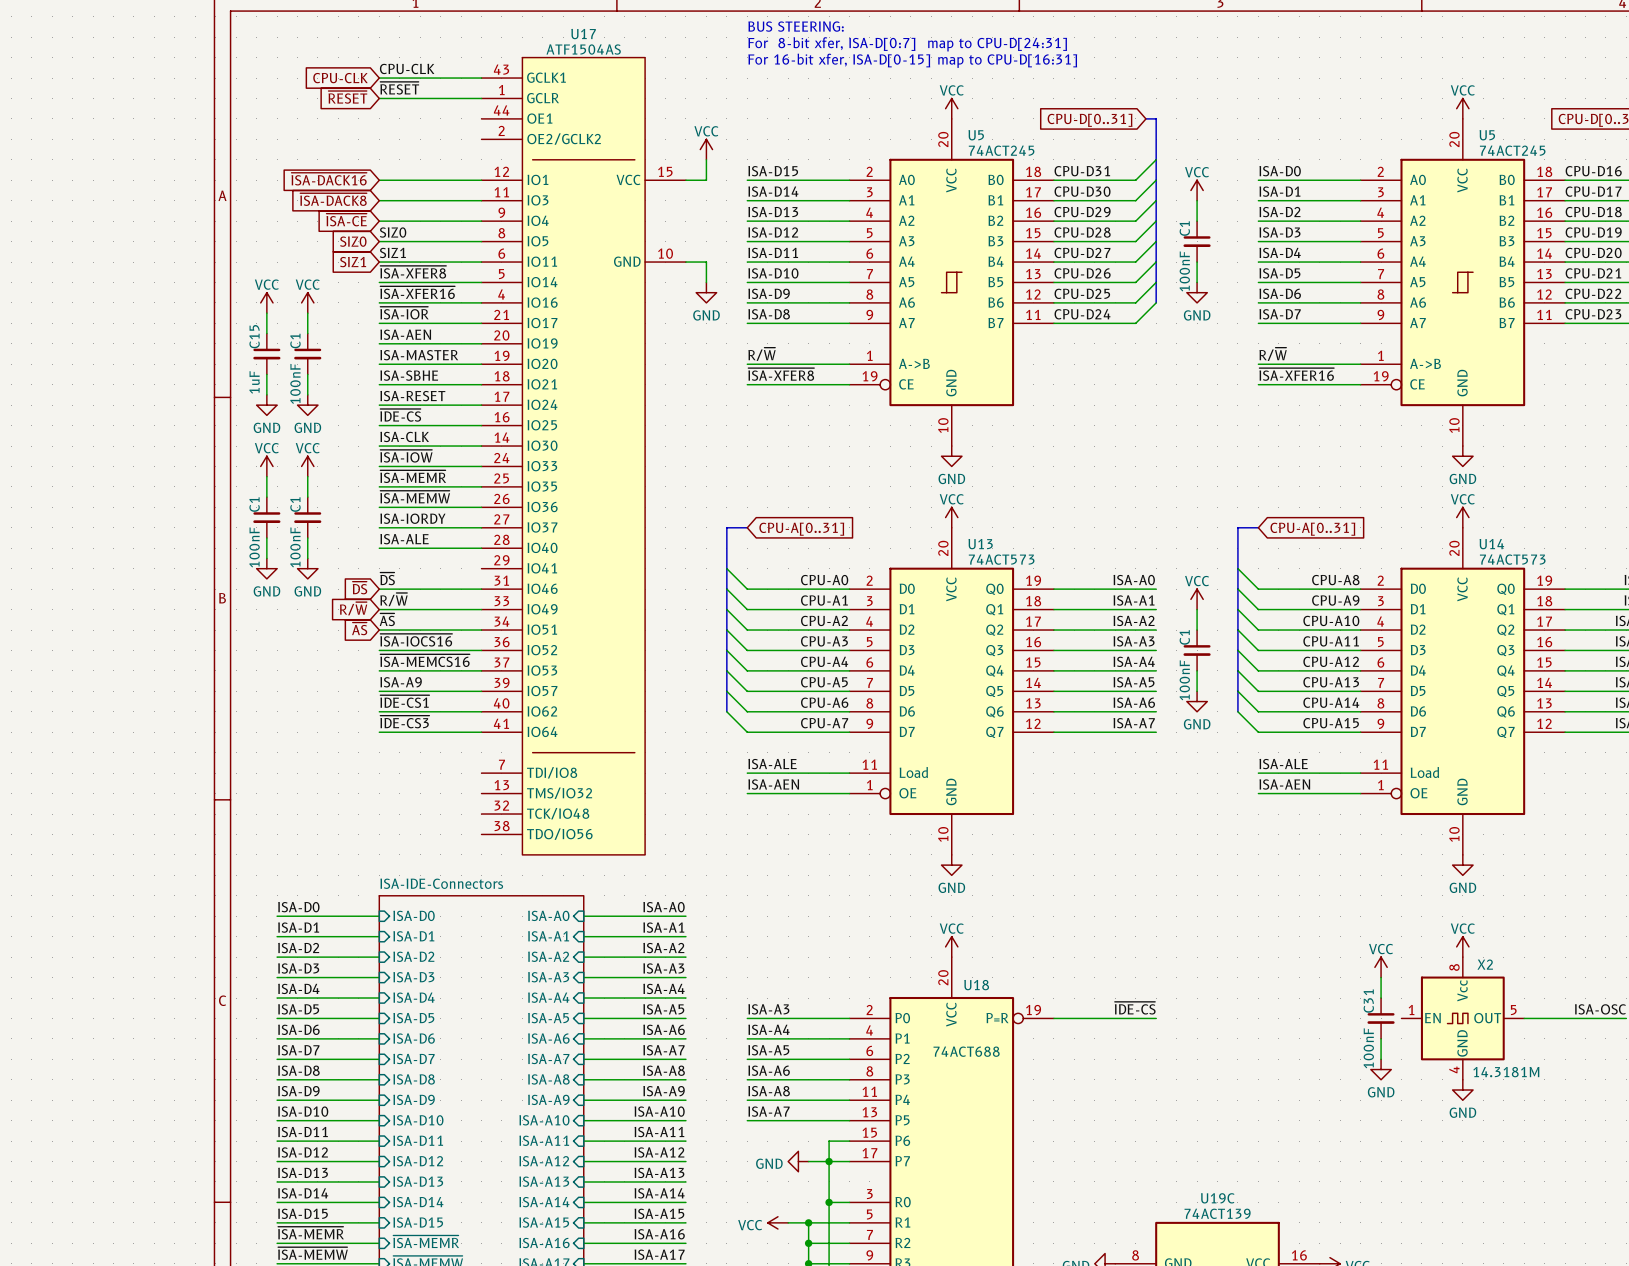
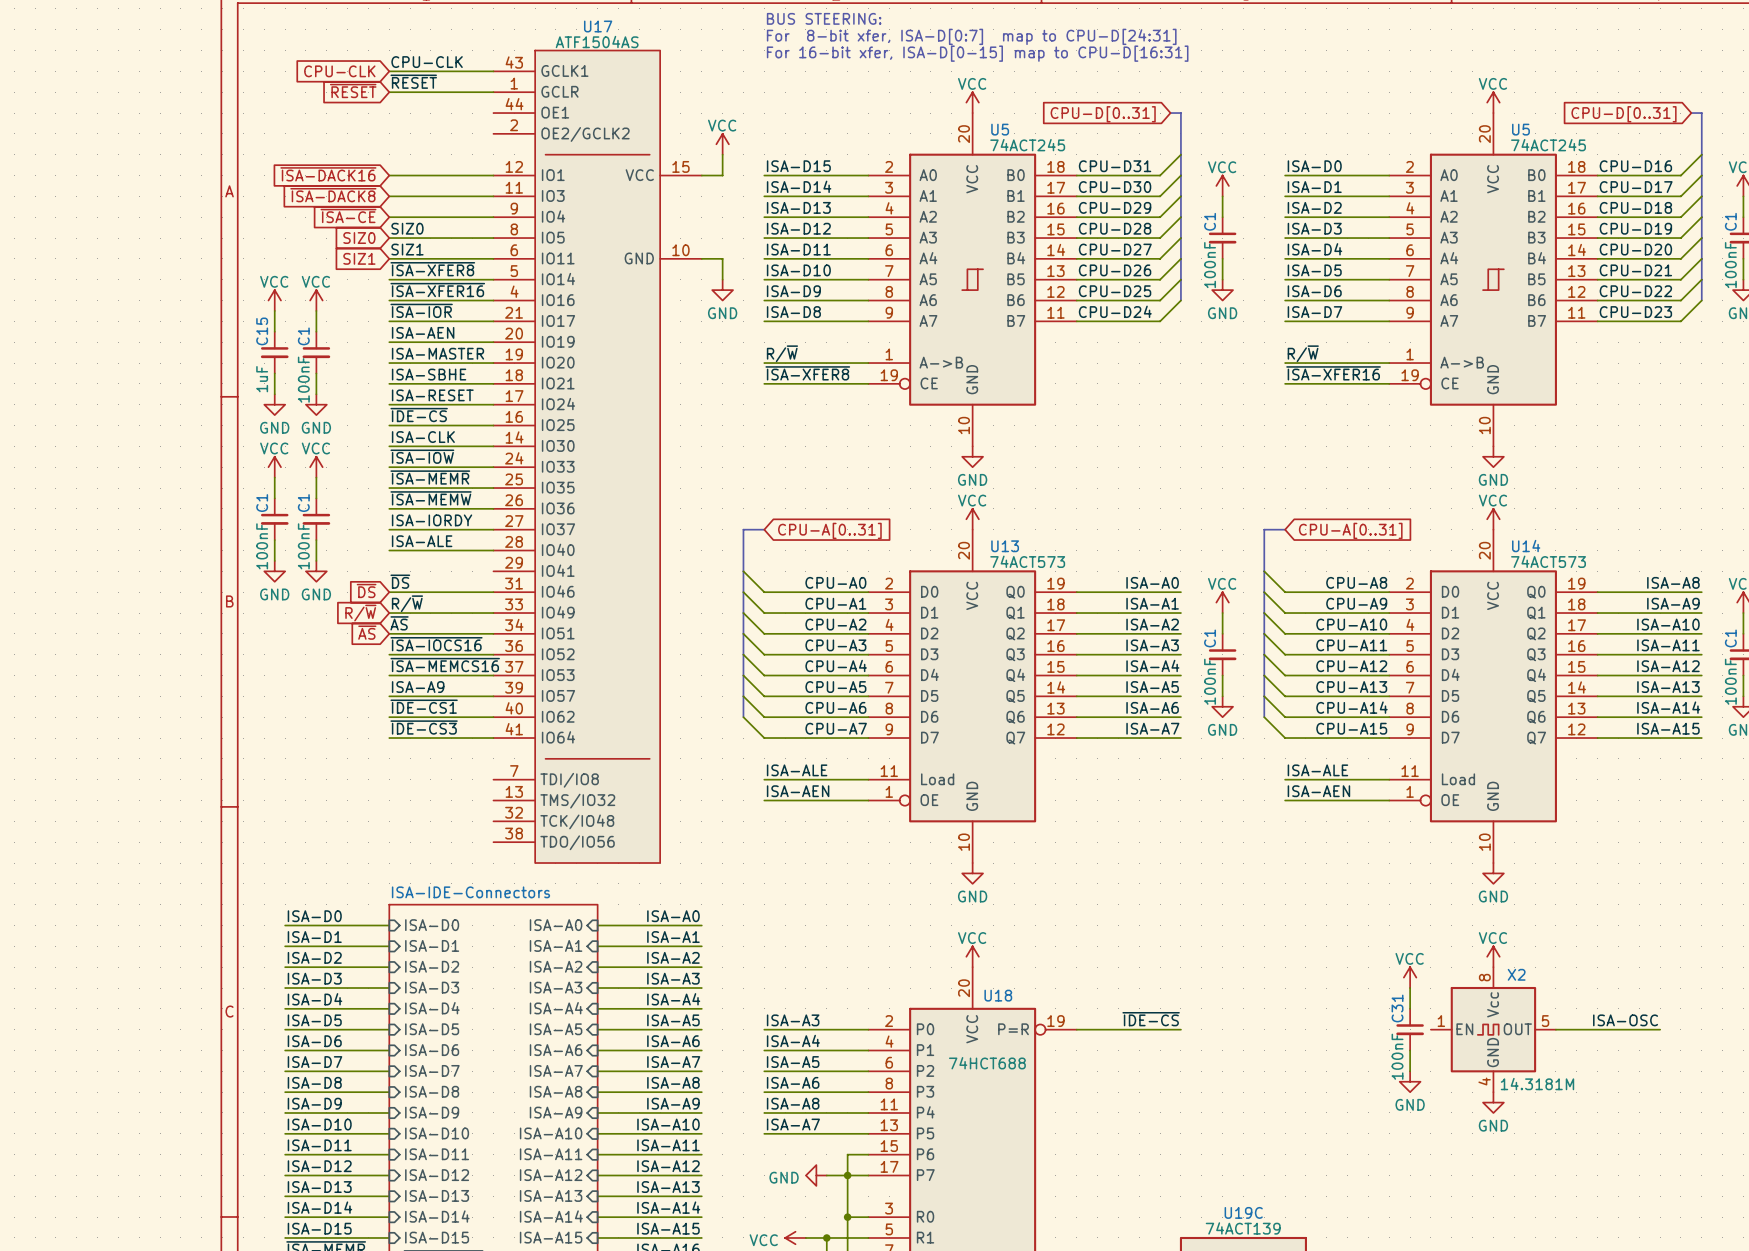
U18 value: 74ACT688 (966, 1051) -> 74HCT688 (987, 1063)

